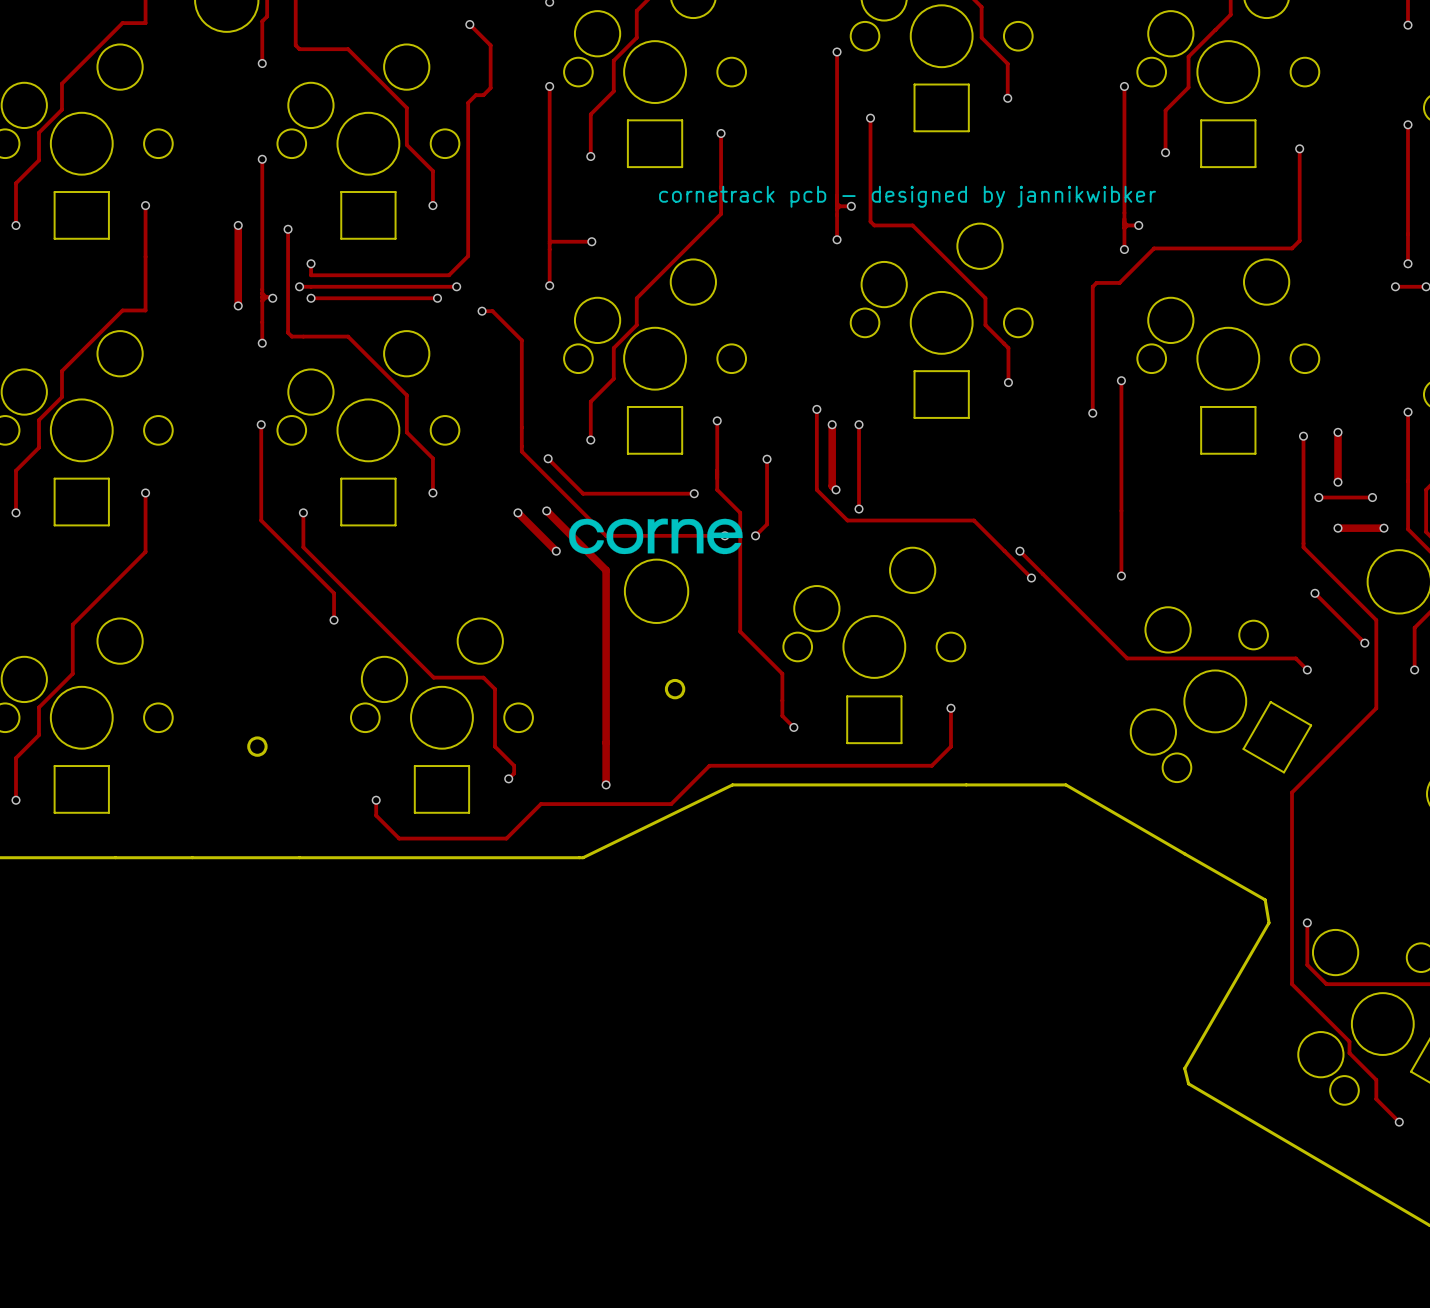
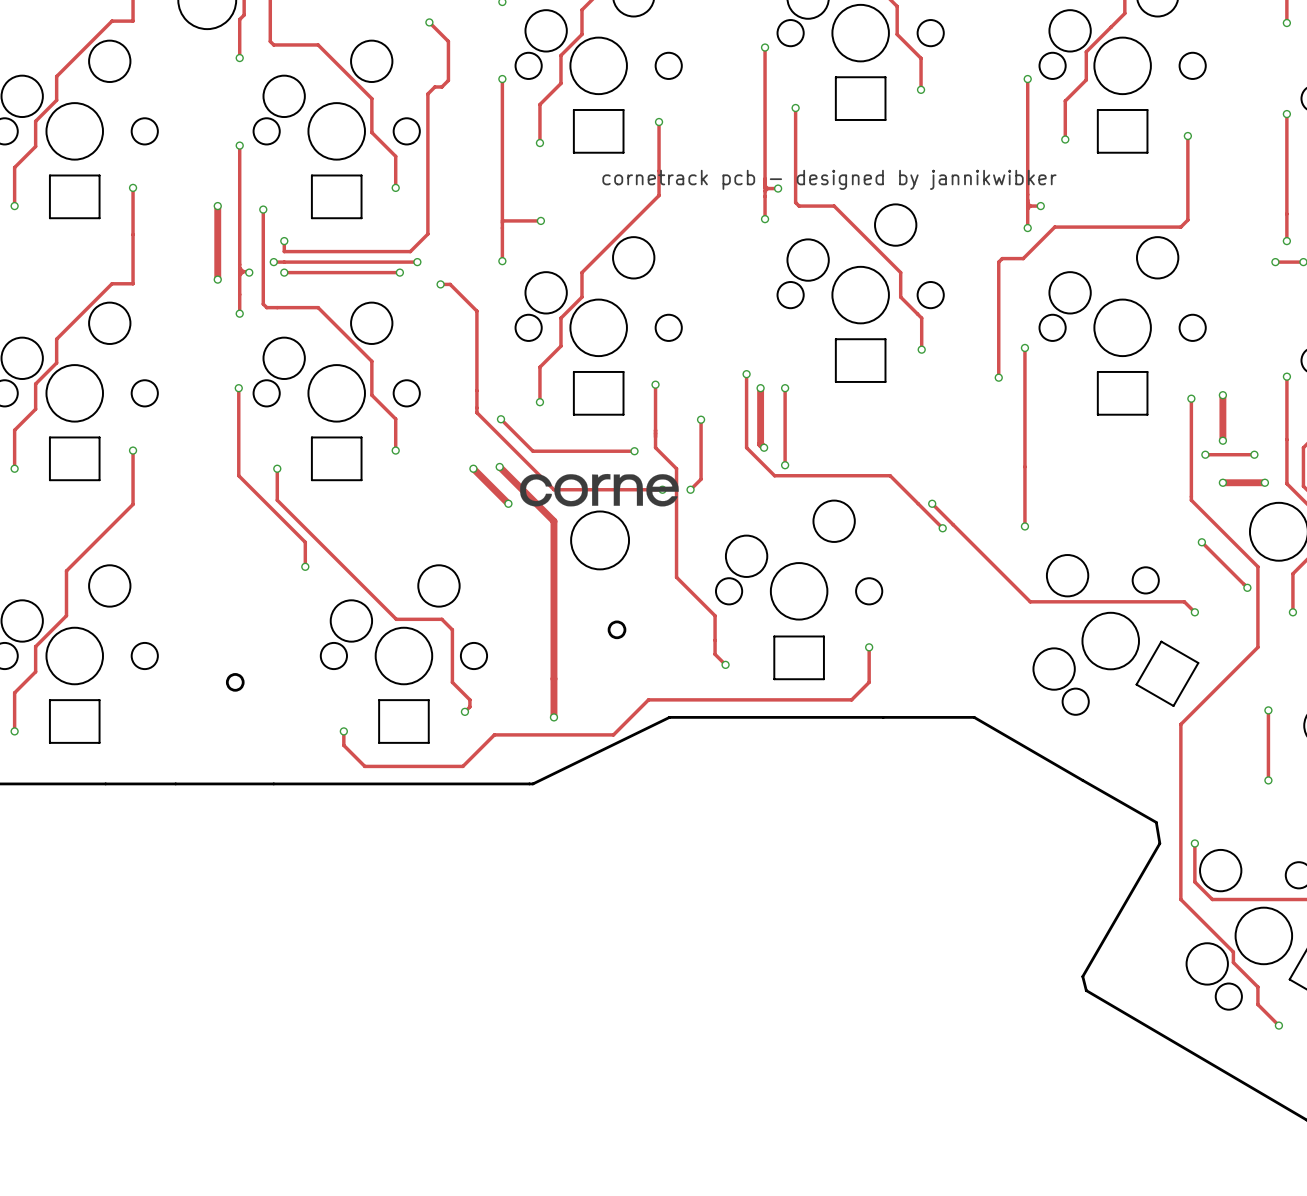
track: none -> (1268, 710) (1268, 780)
via: none -> (1268, 710)
via: none -> (1268, 780)

